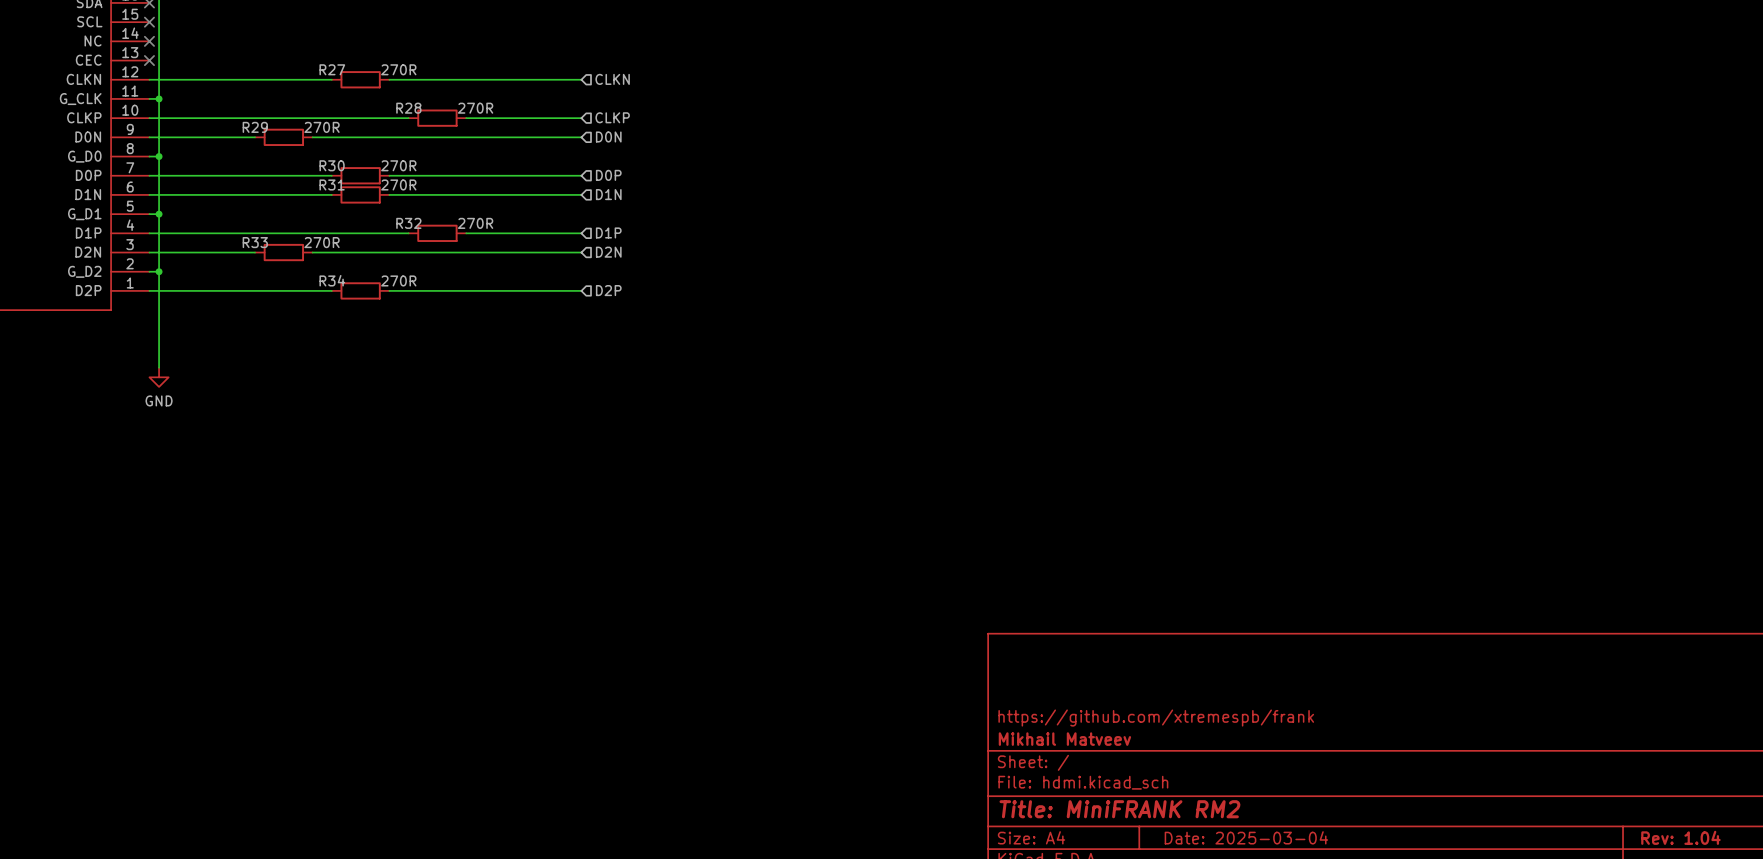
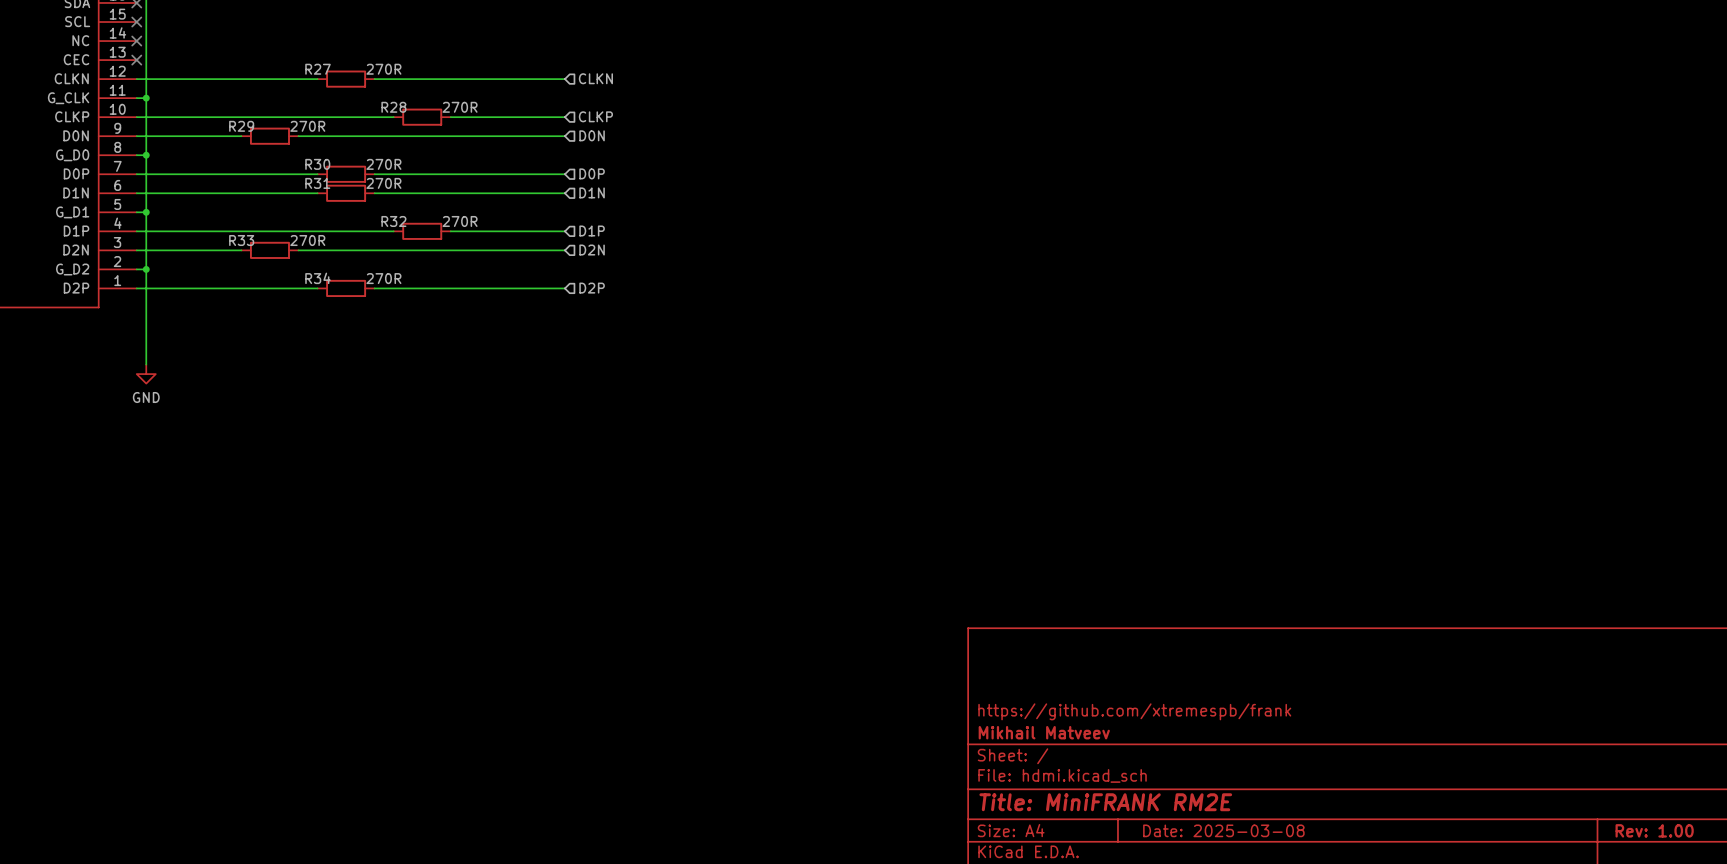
title block: Title: MiniFRANK RM2 (1119, 809) -> Title: MiniFRANK RM2E (1105, 802)
title block: Date: 2025-03-04 (1246, 837) -> Date: 2025-03-08 (1223, 830)
title block: Rev: 1.04 (1680, 837) -> Rev: 1.00 (1654, 830)

